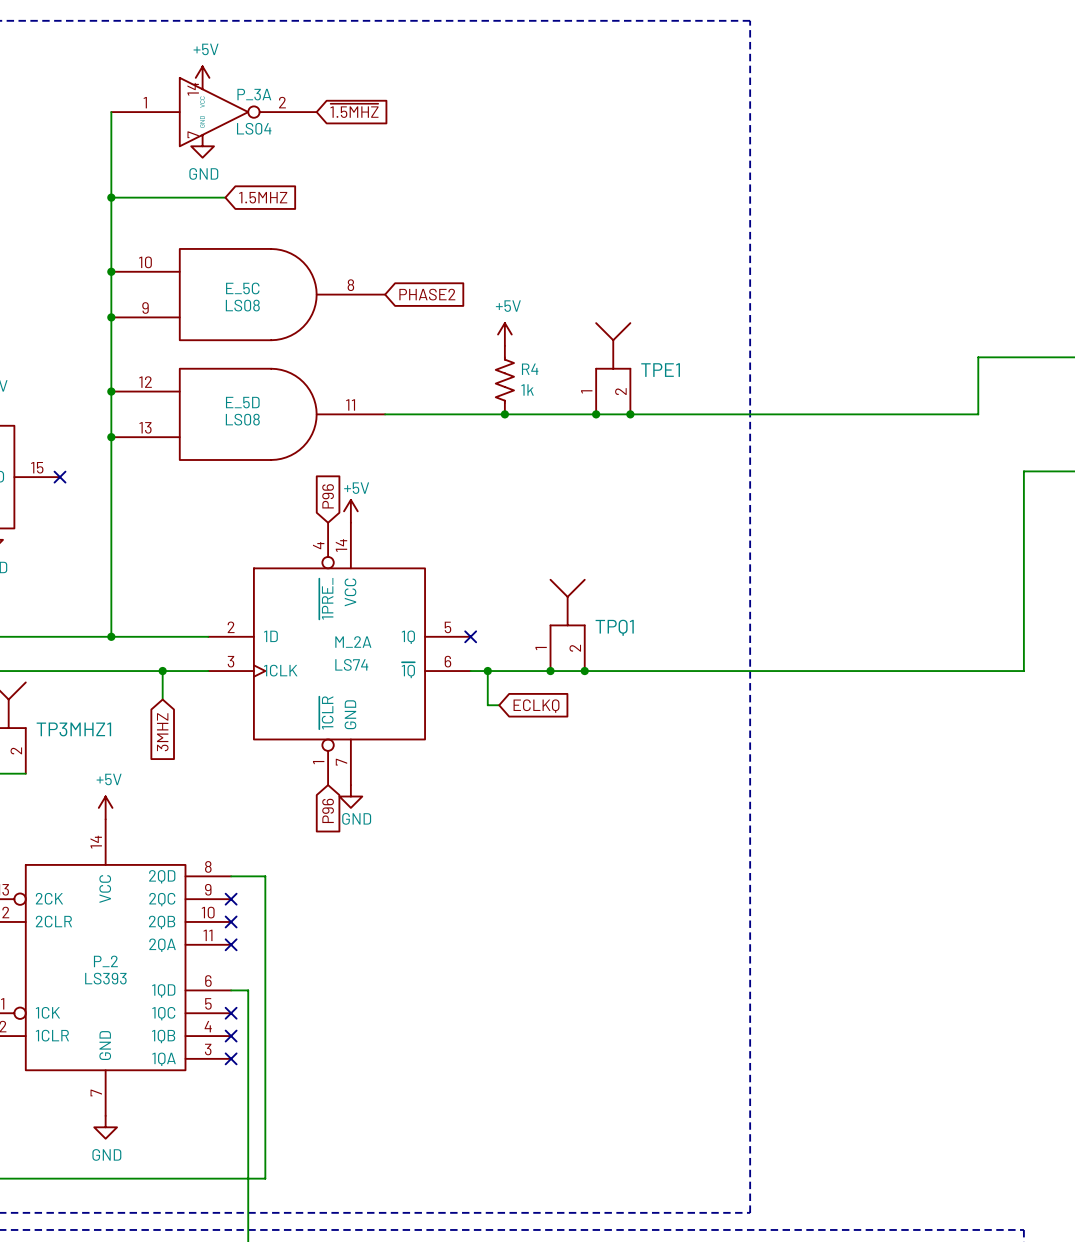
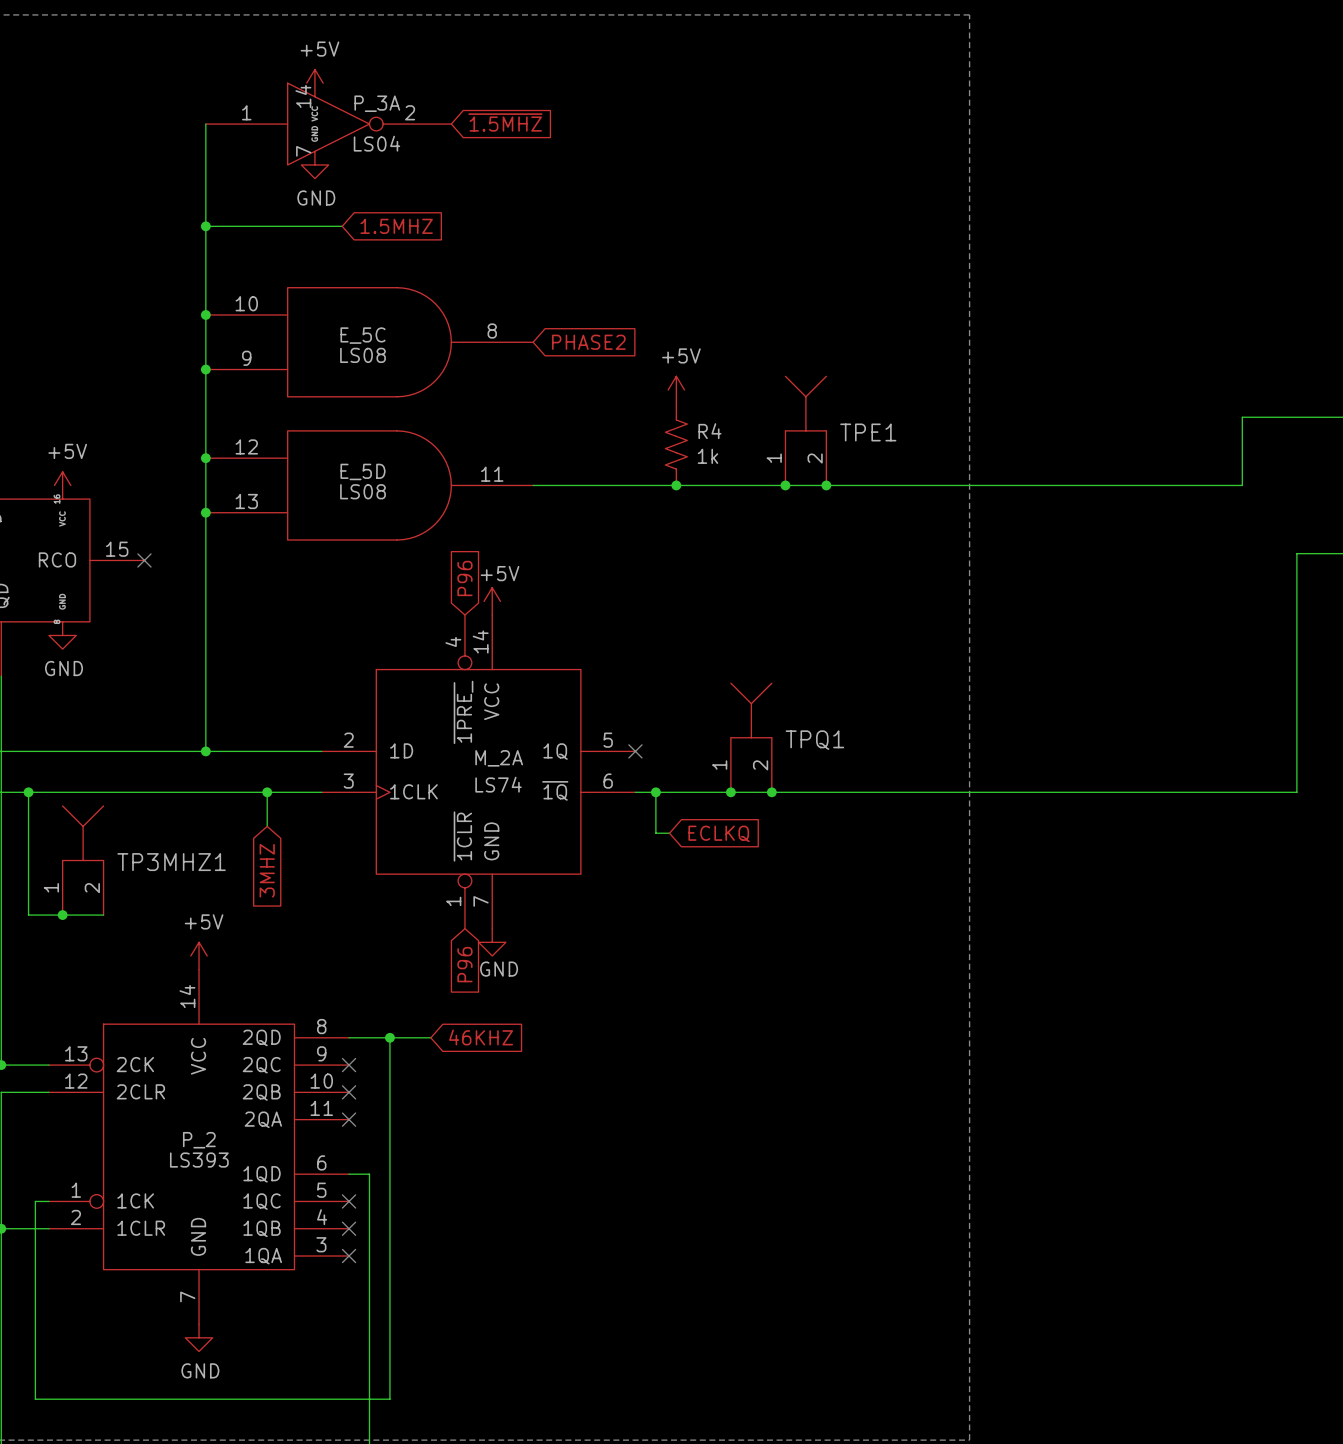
wire: none -> (389, 1037) (430, 1037)
junction: none -> (389, 1037)
global label: none -> 46KHZ (481, 1037)

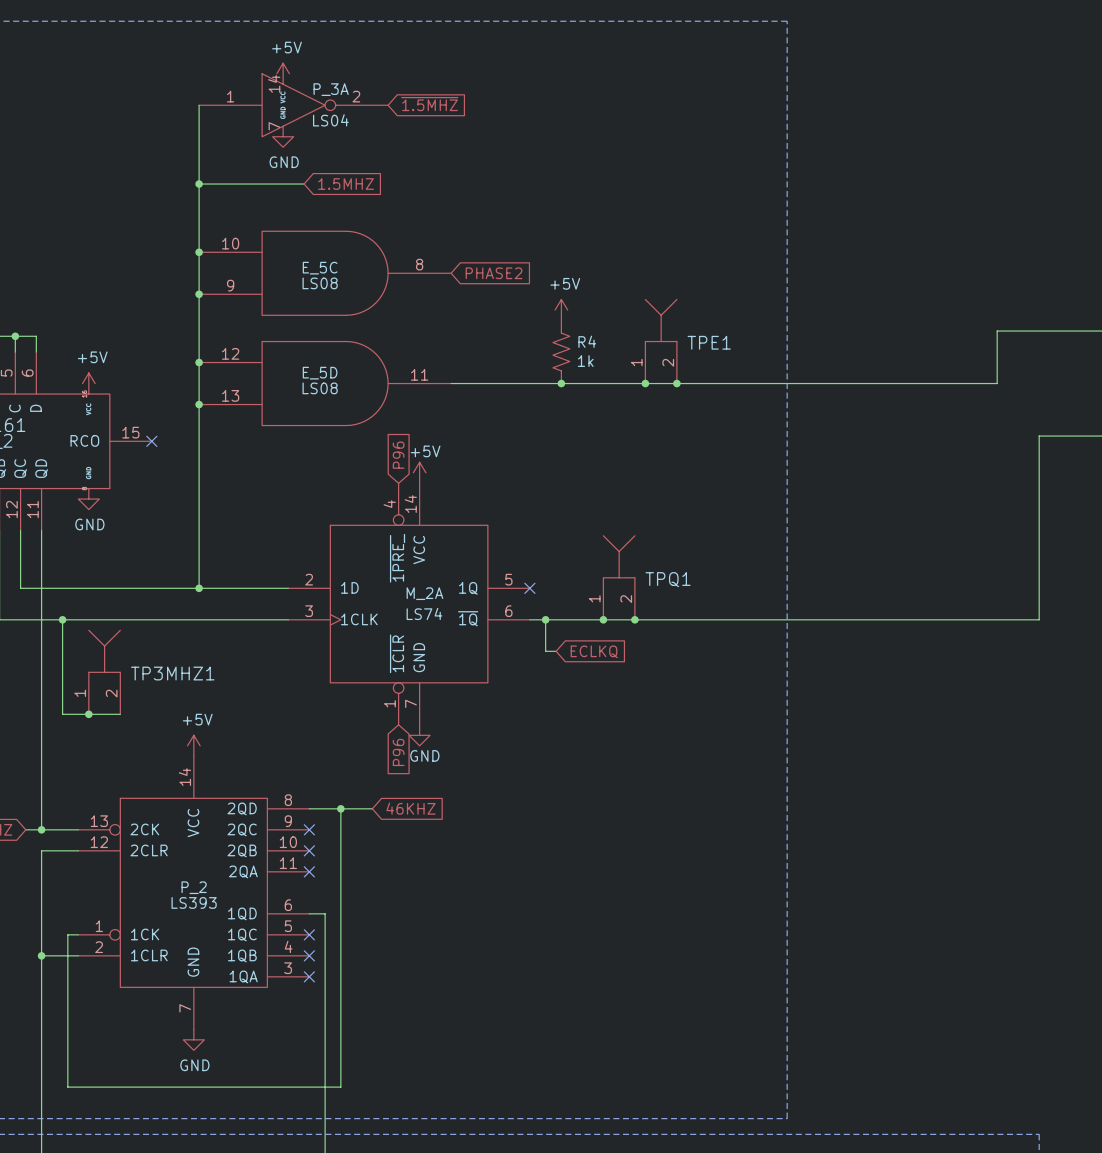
wire: (267, 792) (267, 826) -> none
junction: (267, 792) -> none
global label: 3MHZ (267, 870) -> none

